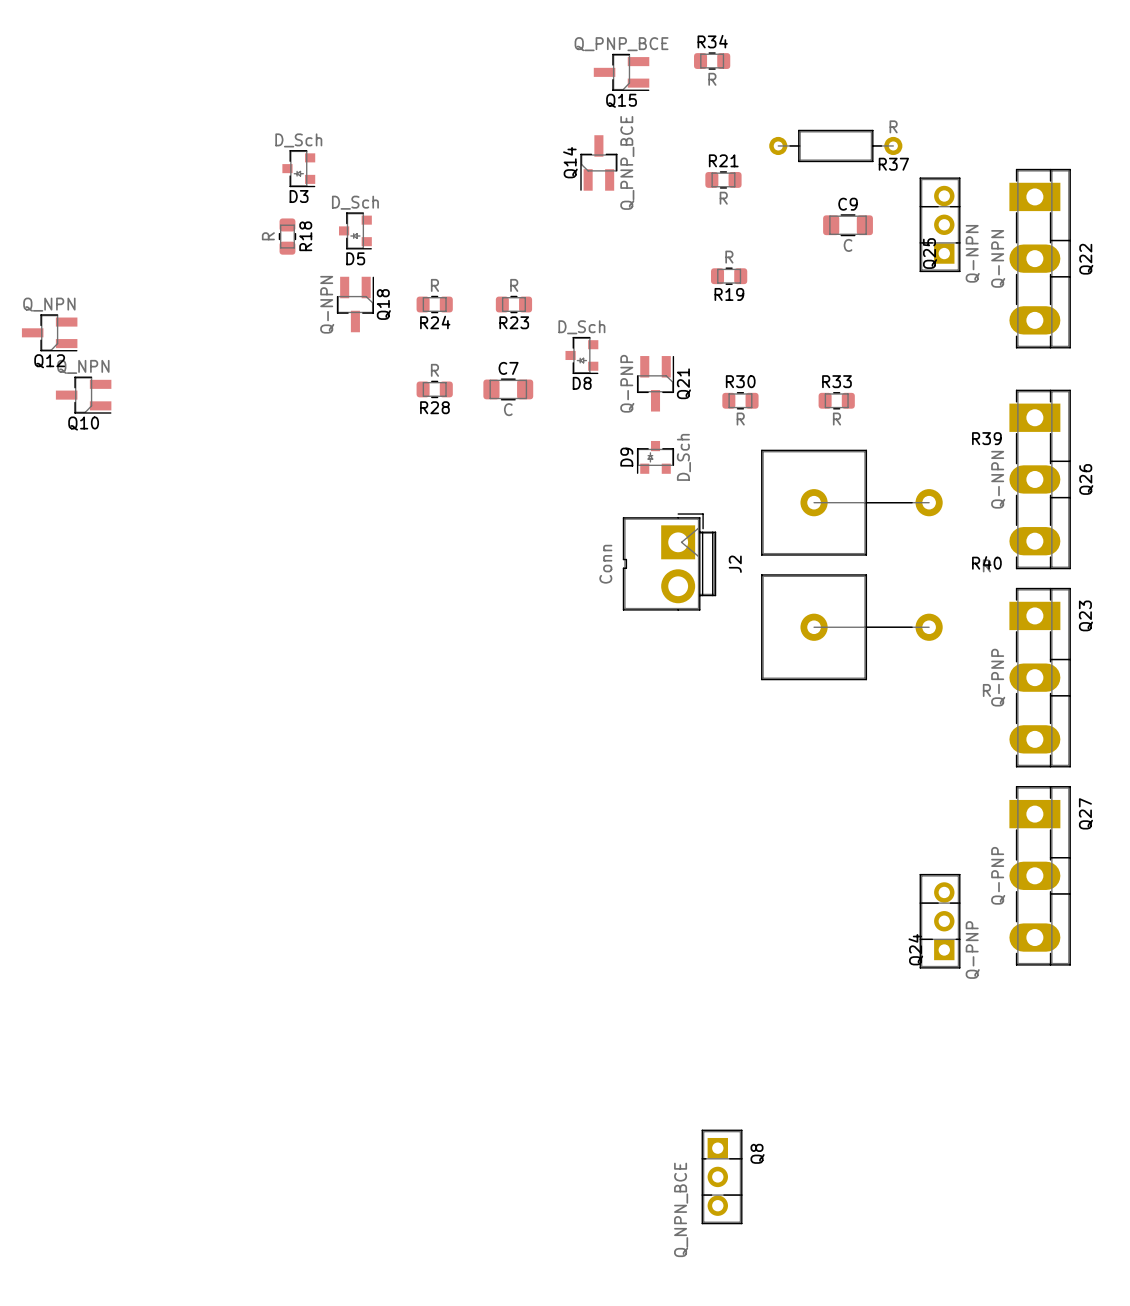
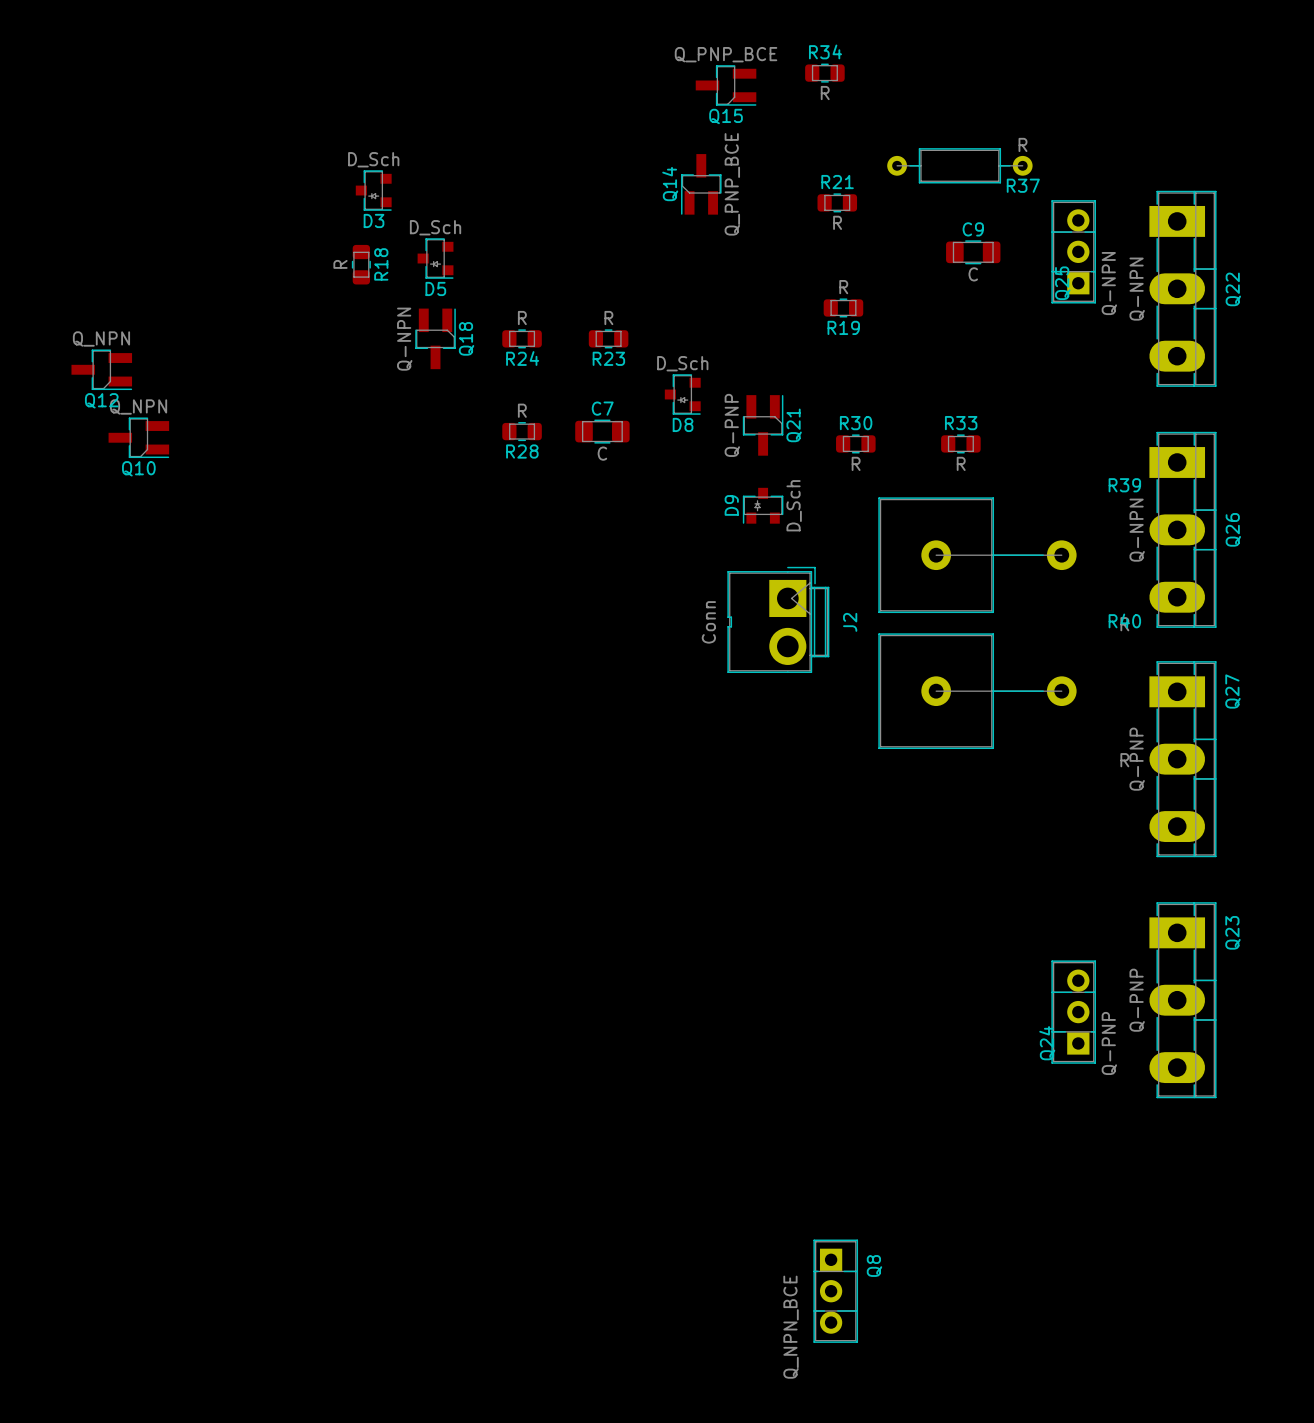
Q23 position: (1040, 677) -> (1182, 1000)
Q27 position: (1040, 875) -> (1182, 759)

